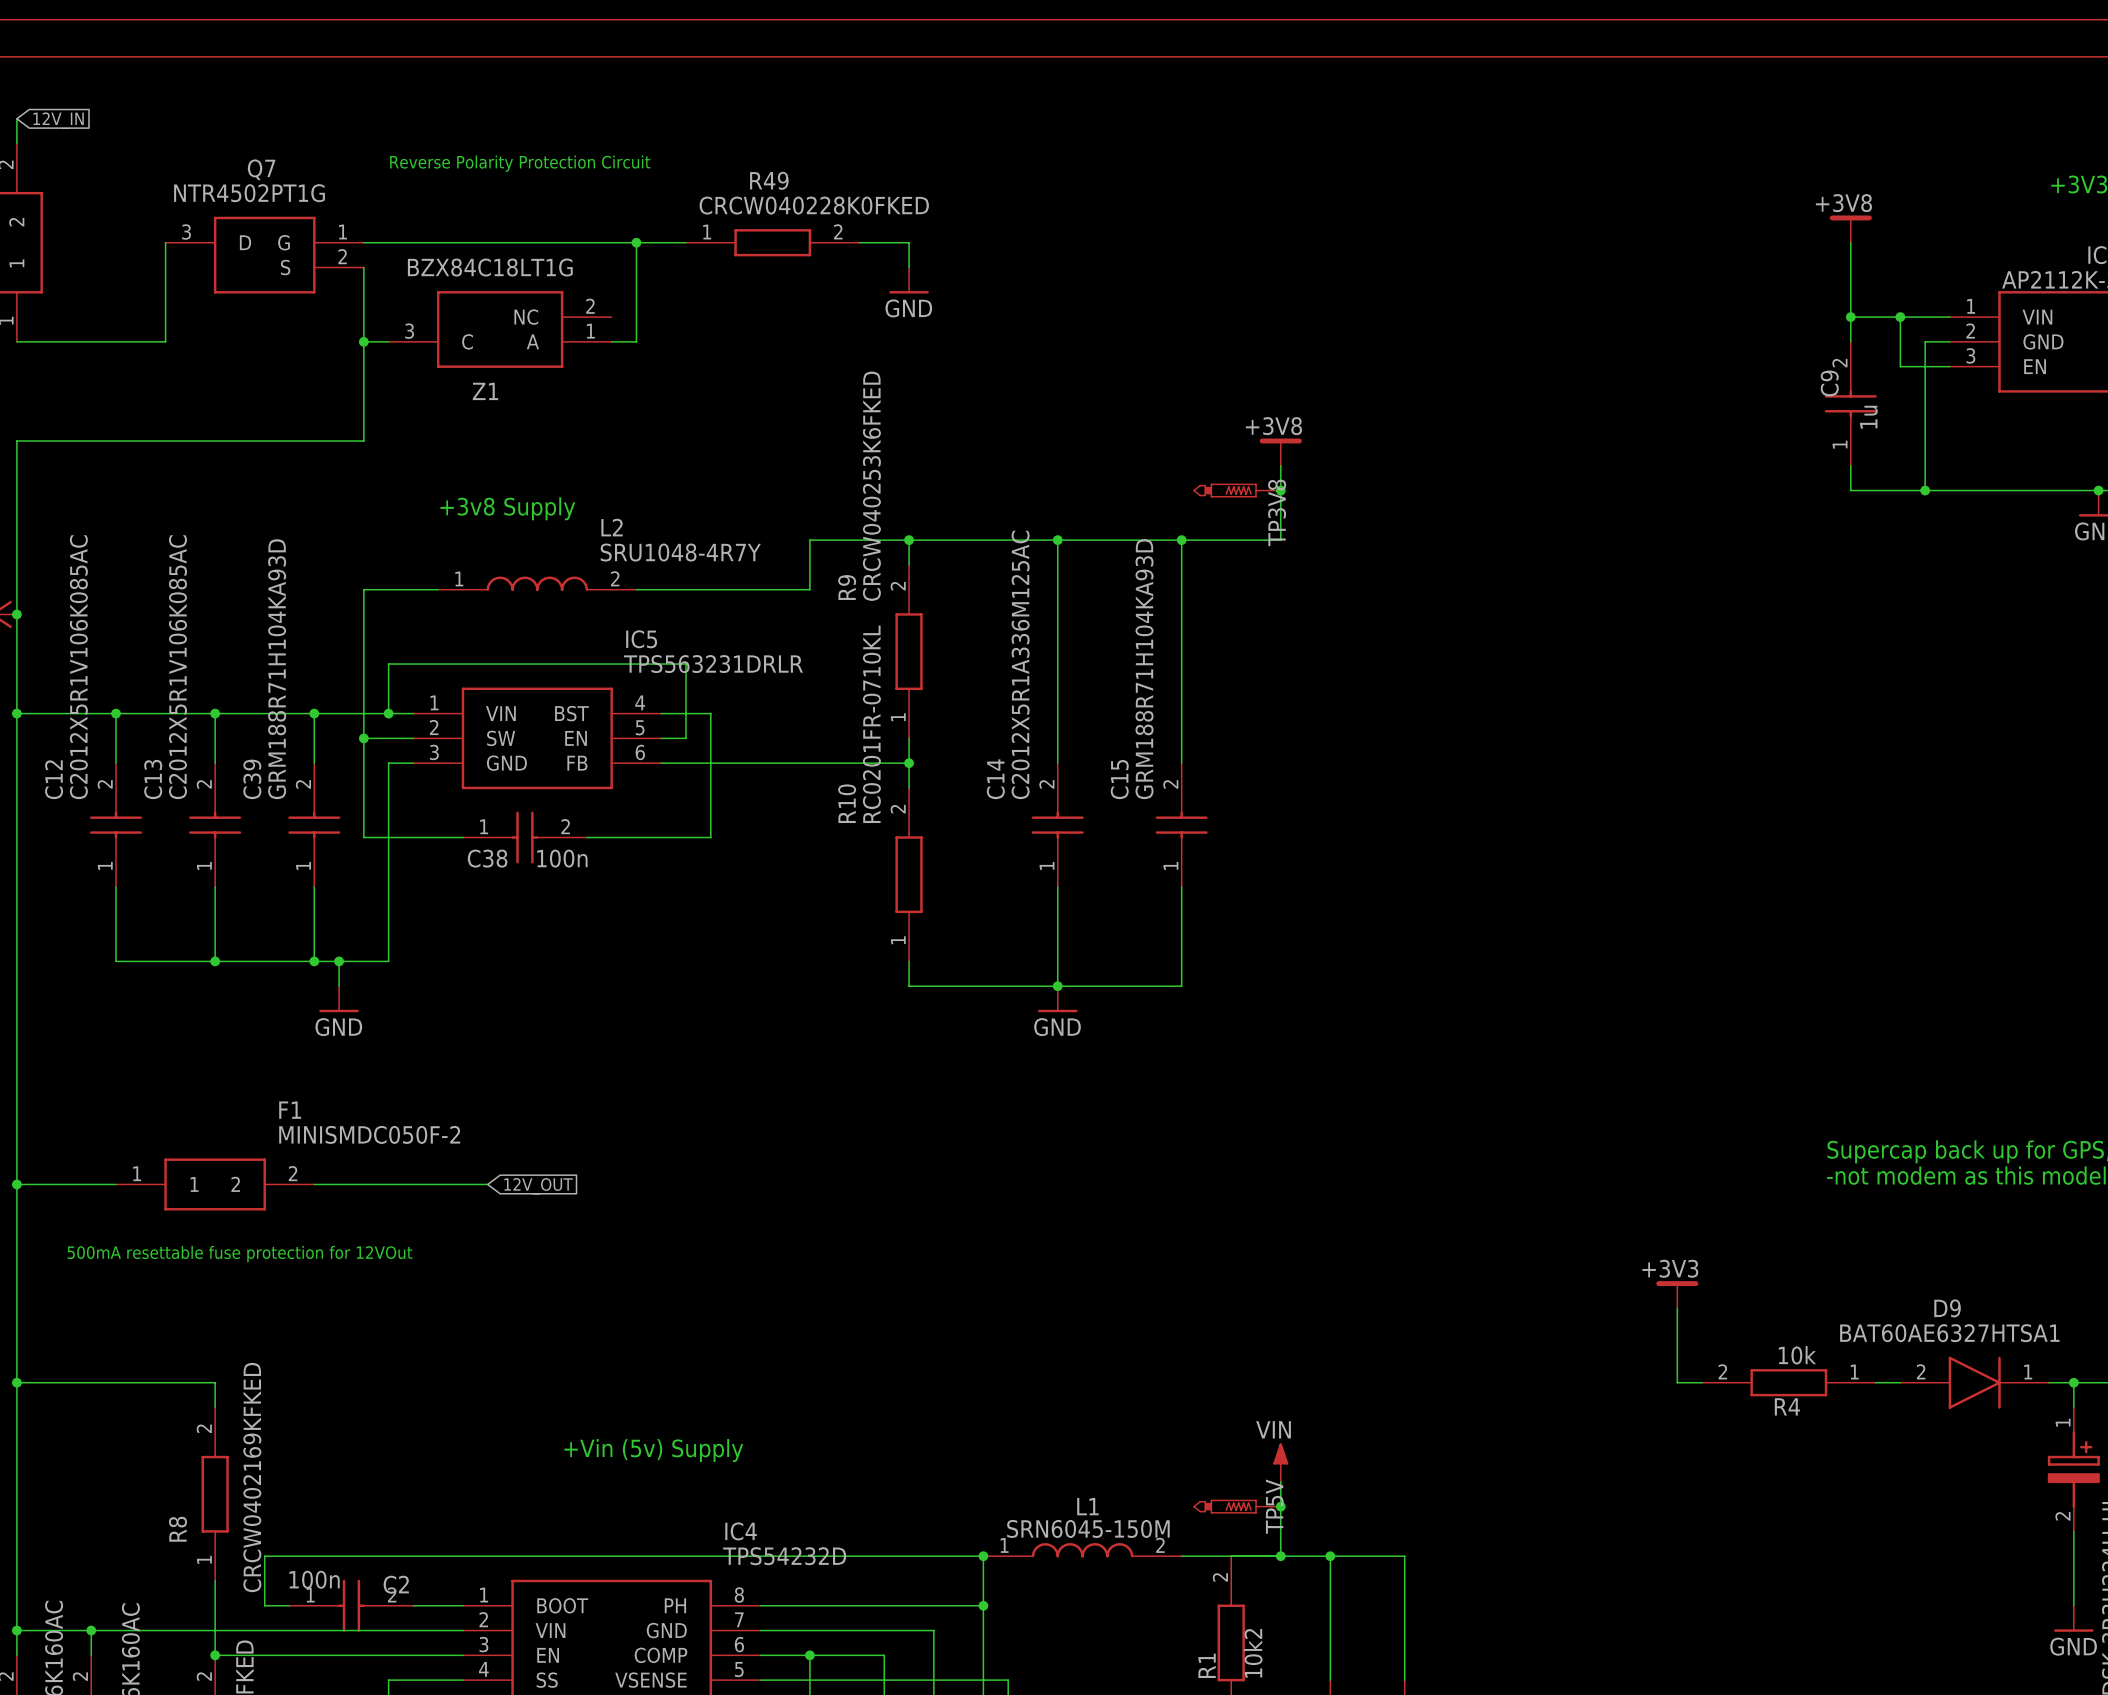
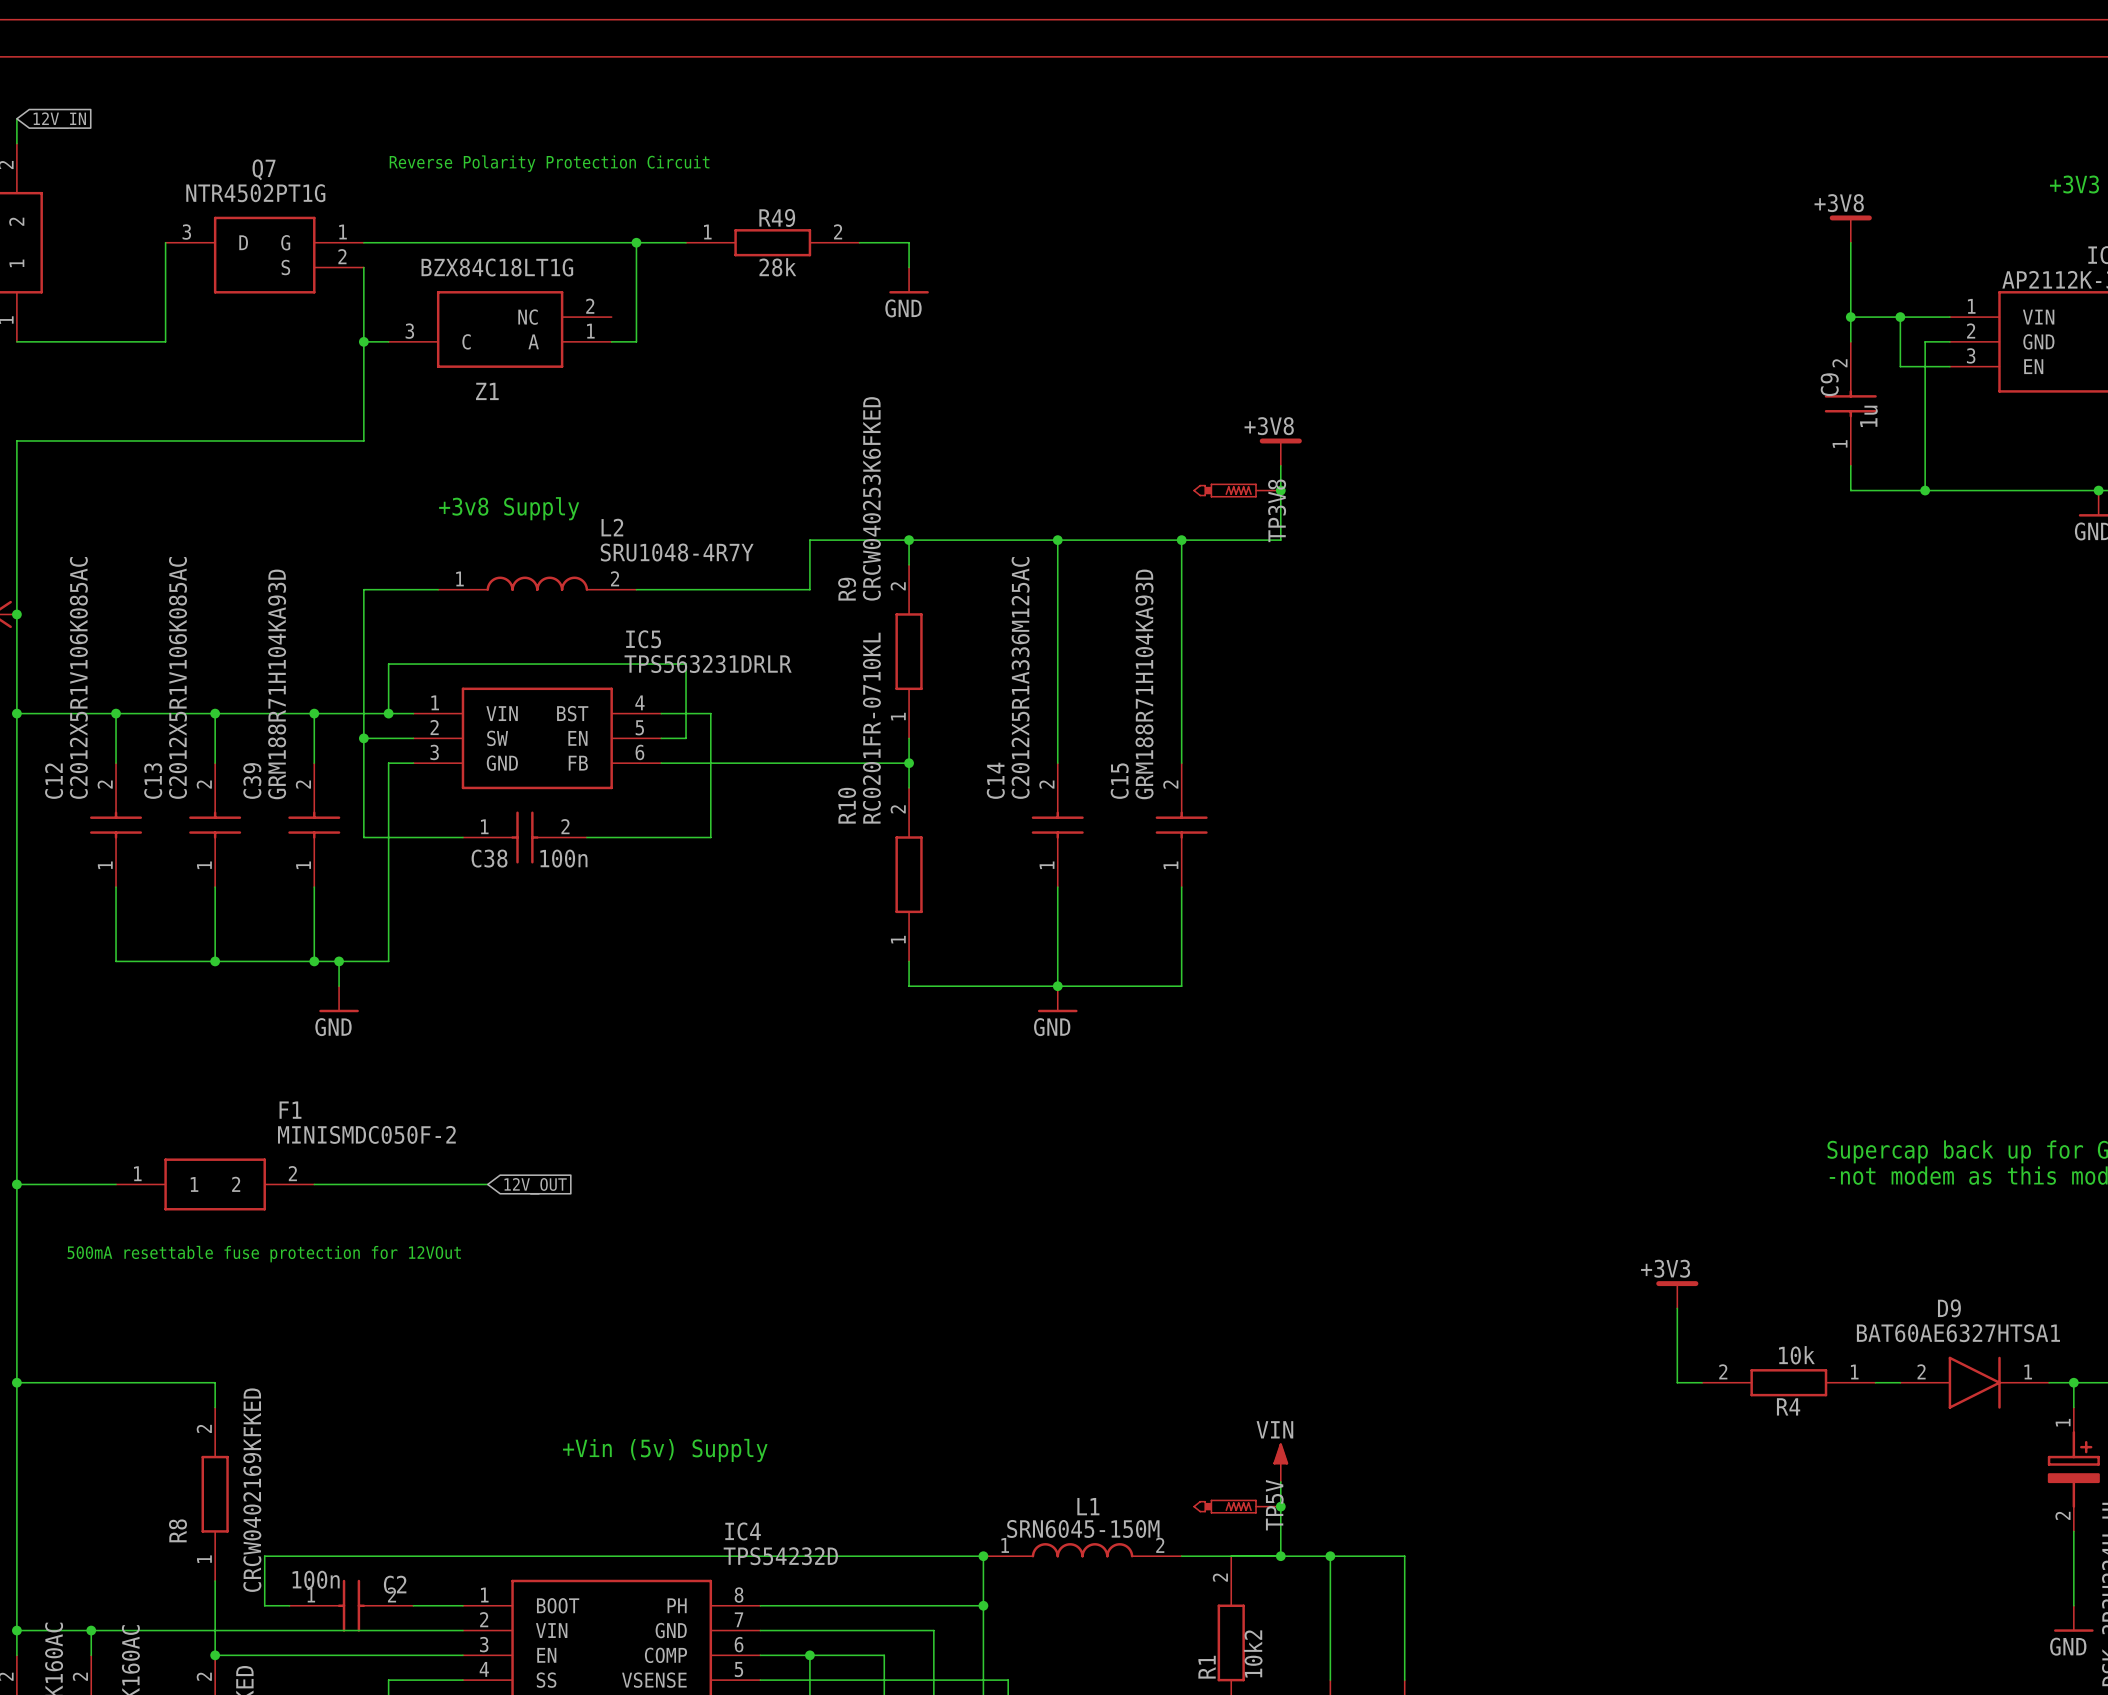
R49 name position: R49 (769, 180) -> R49 (777, 217)
R49 value: CRCW040228K0FKED (814, 205) -> 28k (777, 267)

